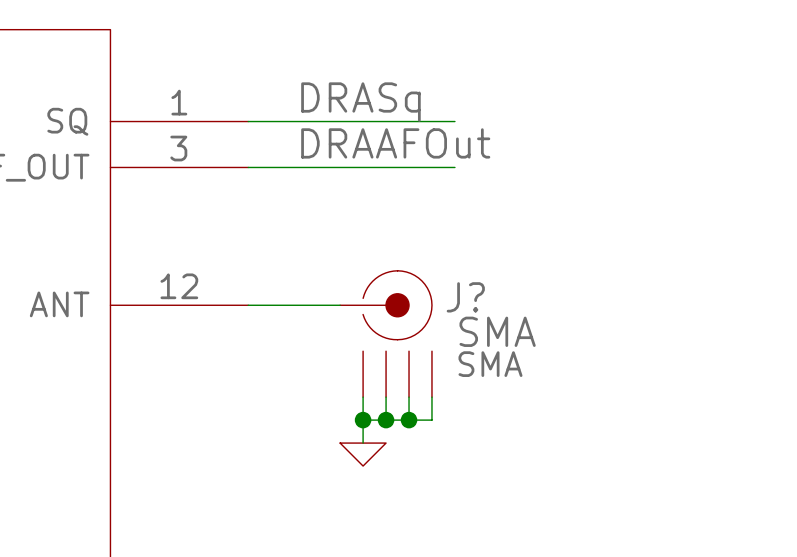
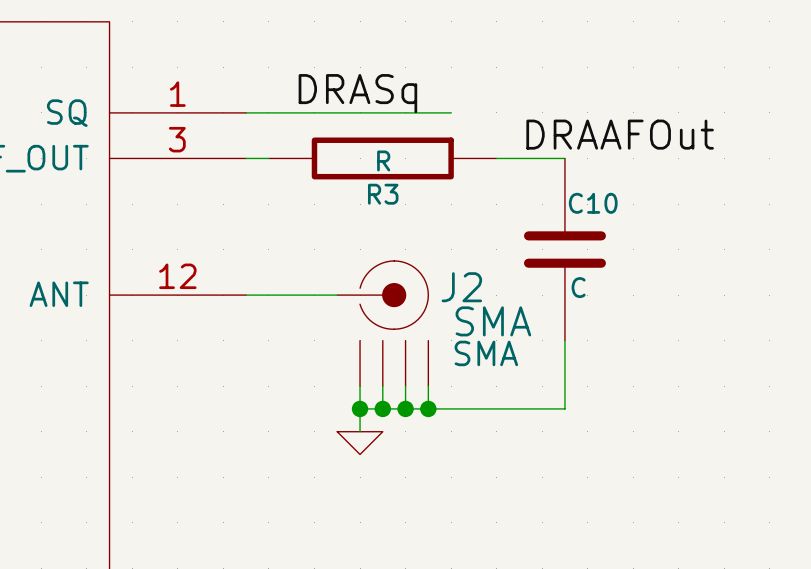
label position: DRAAFOut (395, 143) -> DRAAFOut (620, 134)
wire: (271, 167) (454, 167) -> none
R3: none -> R (382, 158)
wire: none -> (496, 158) (564, 158)
C10: none -> C (564, 249)
J? name: J? (465, 297) -> J2 (461, 287)
wire: none -> (564, 340) (564, 408) (428, 408)
junction: none -> (428, 408)

